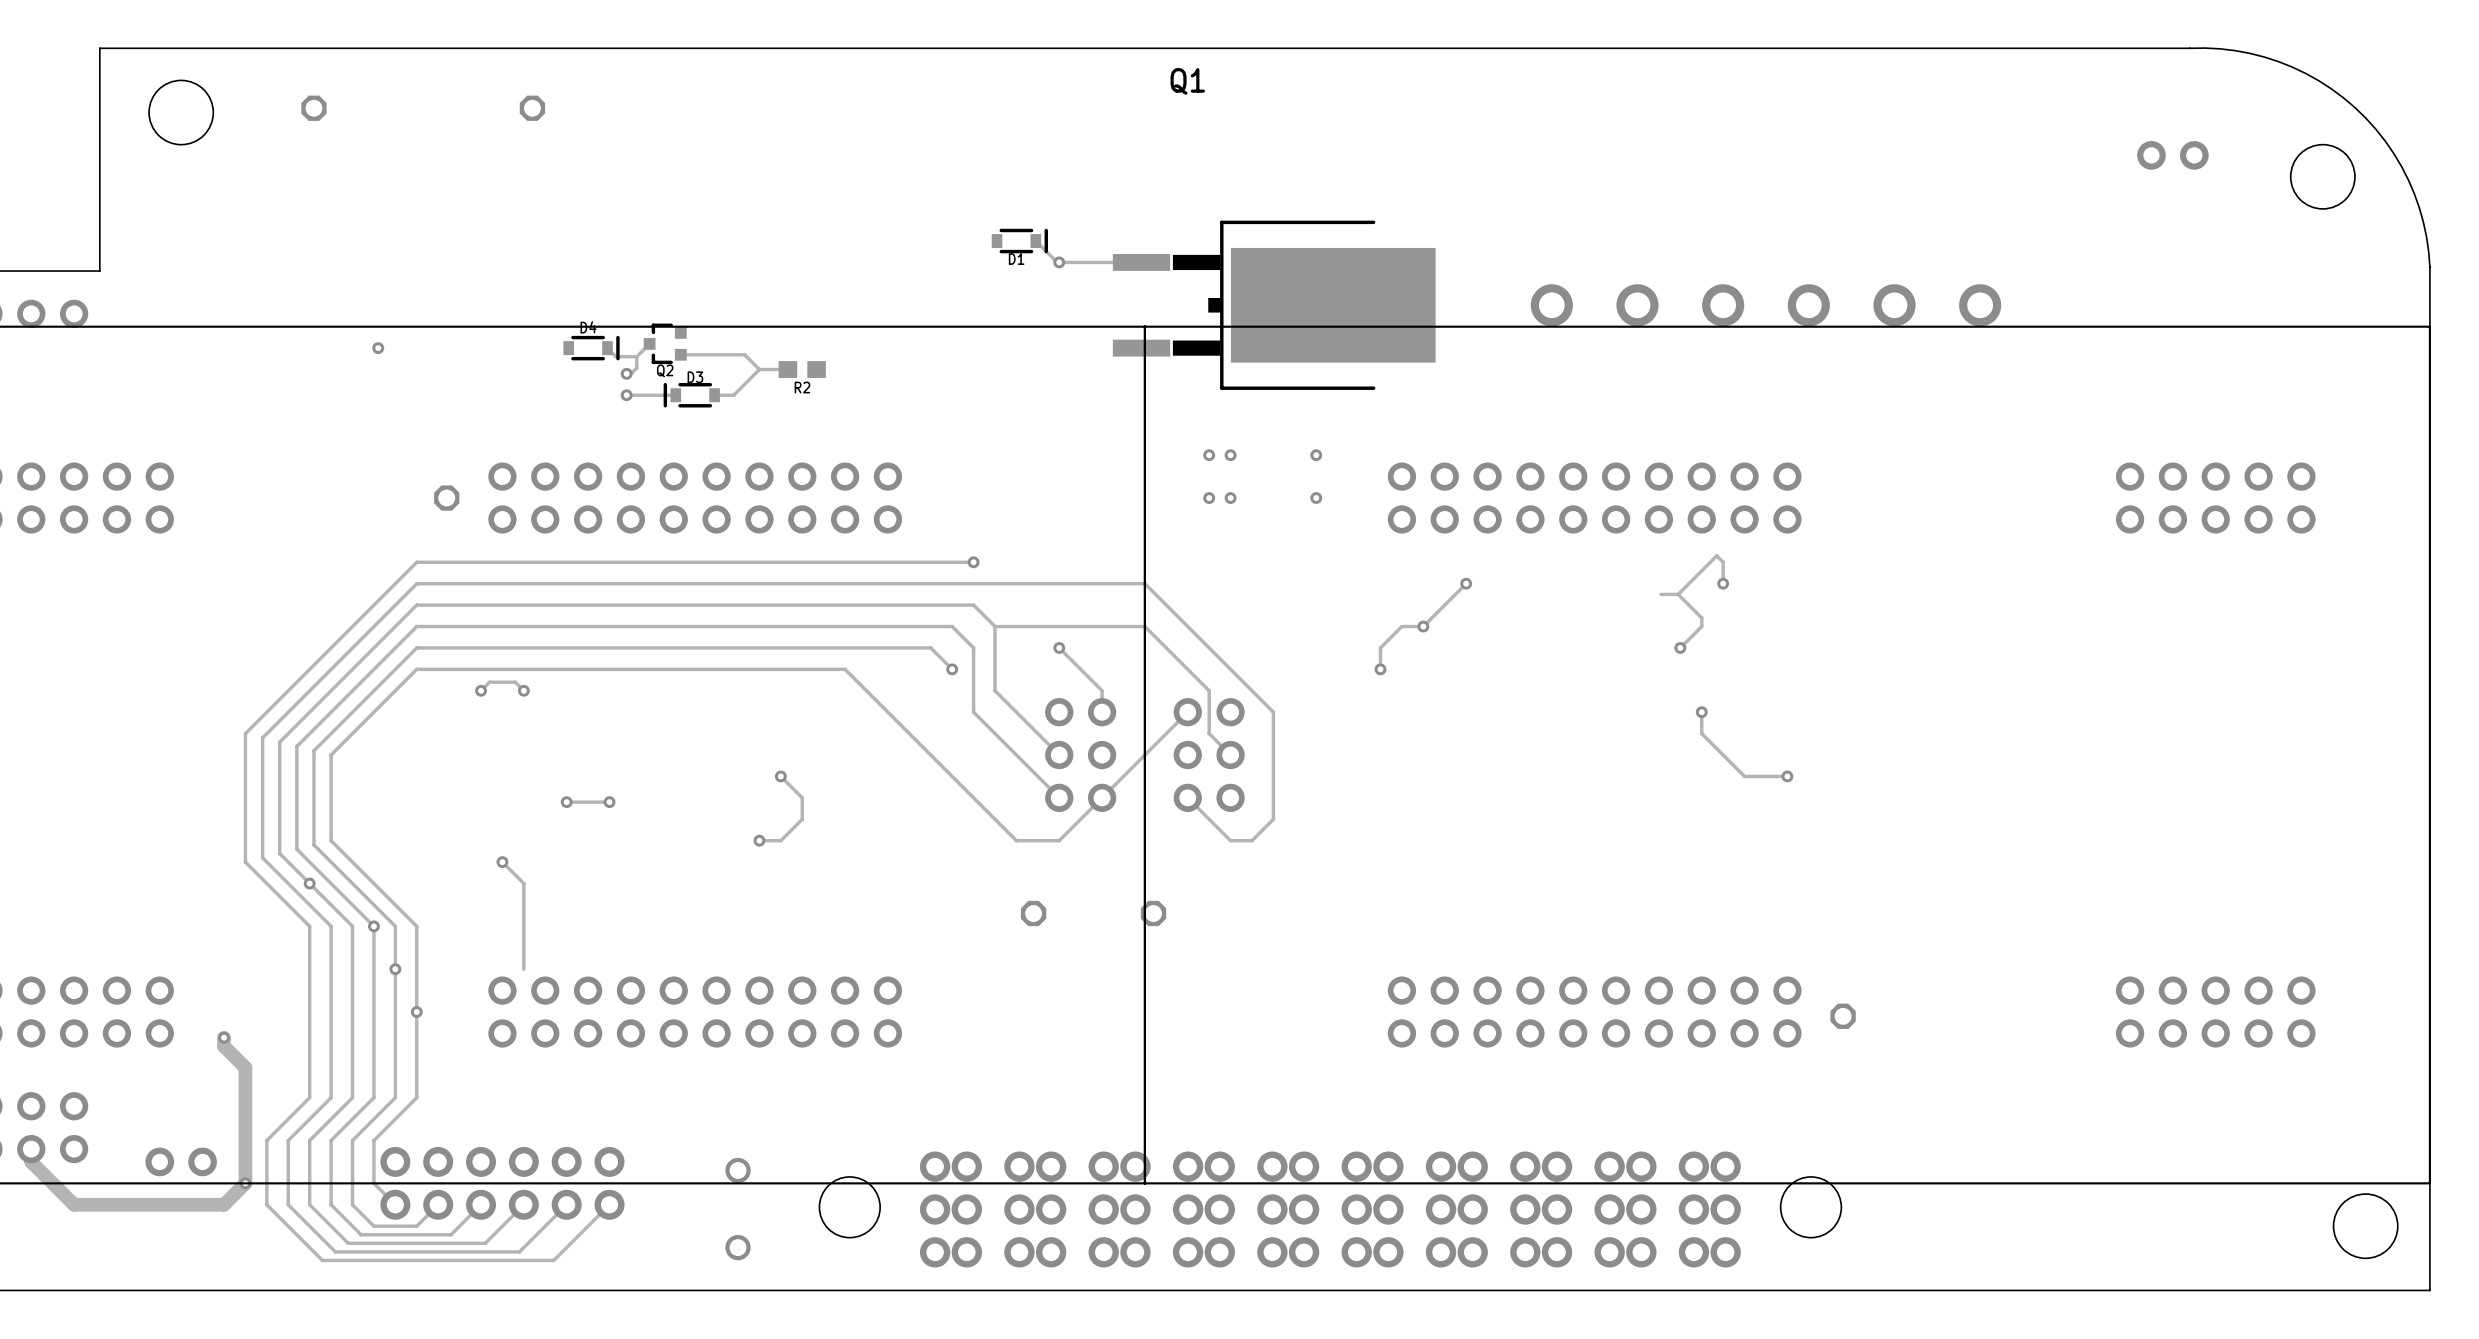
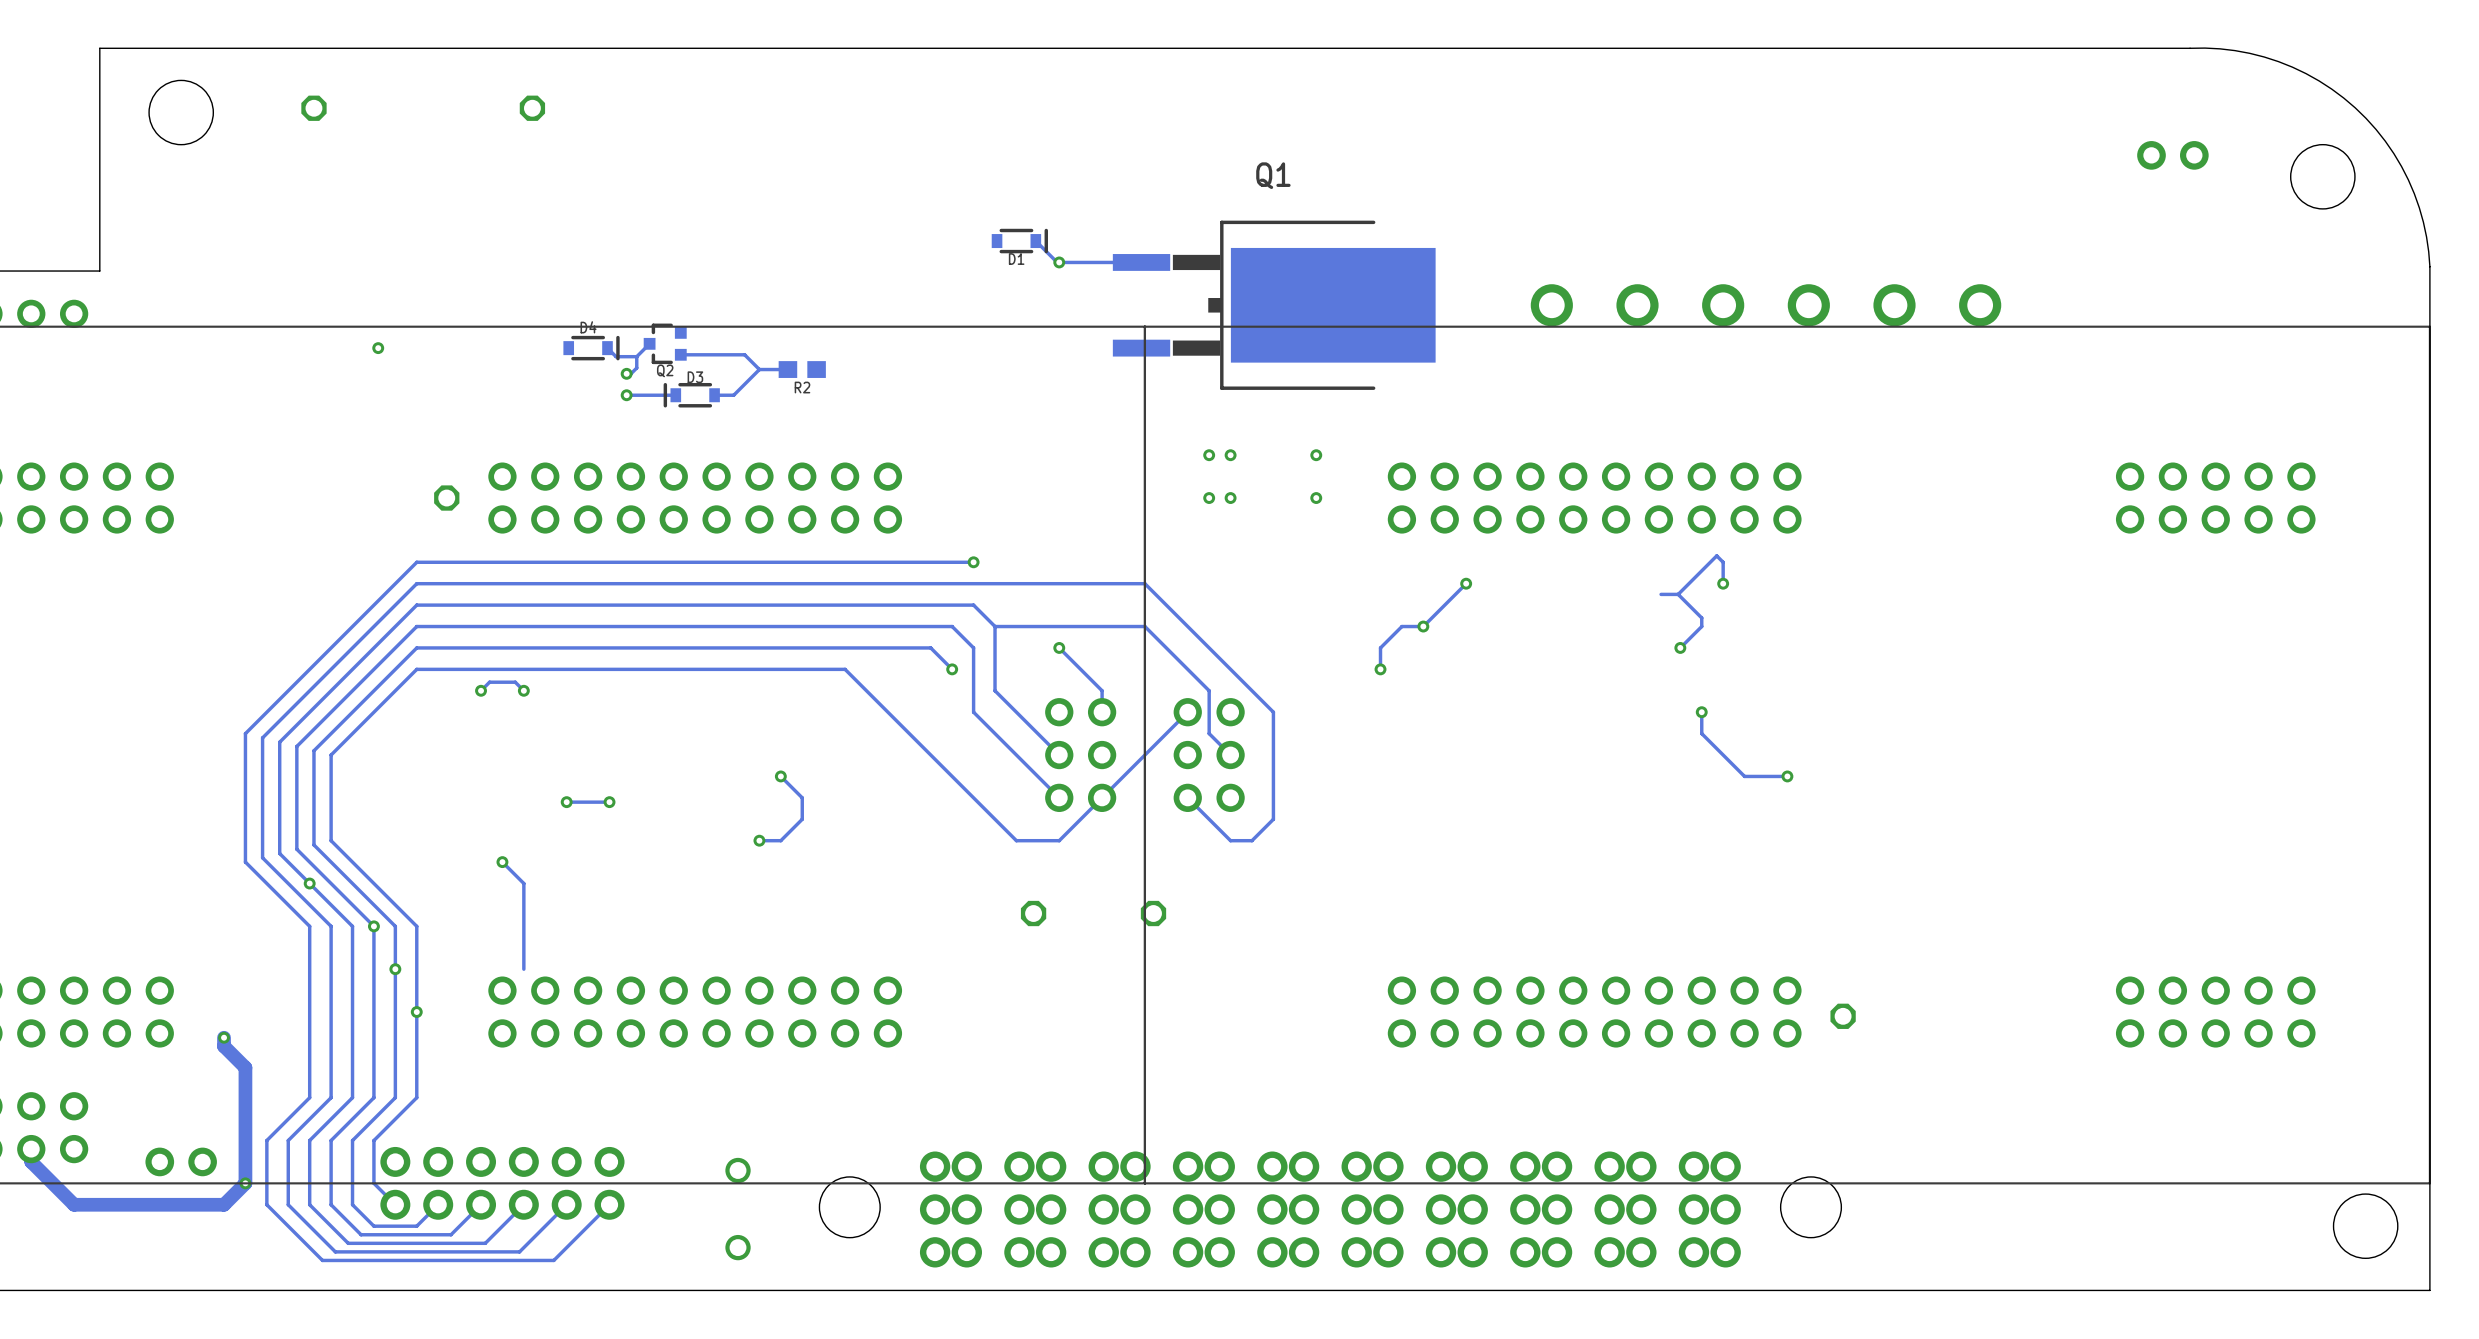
Q1 name position: Q1 (1187, 81) -> Q1 (1273, 175)

